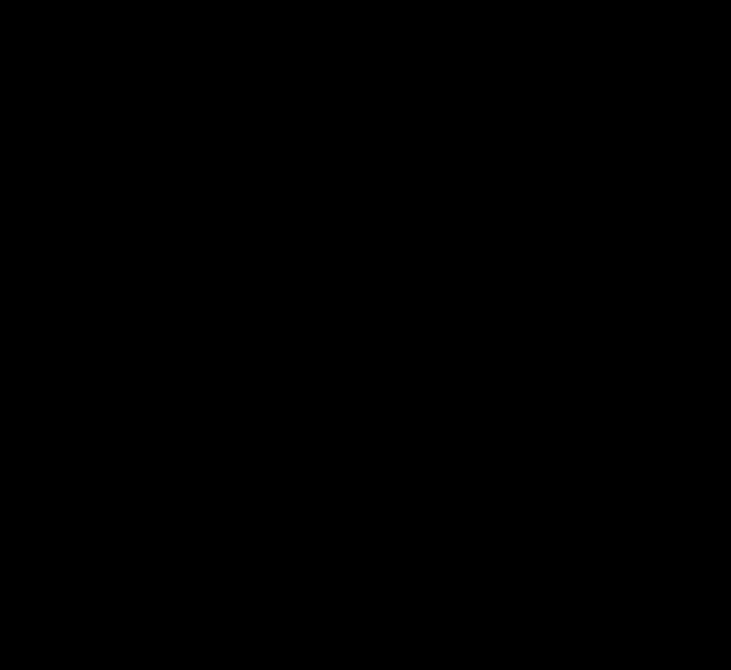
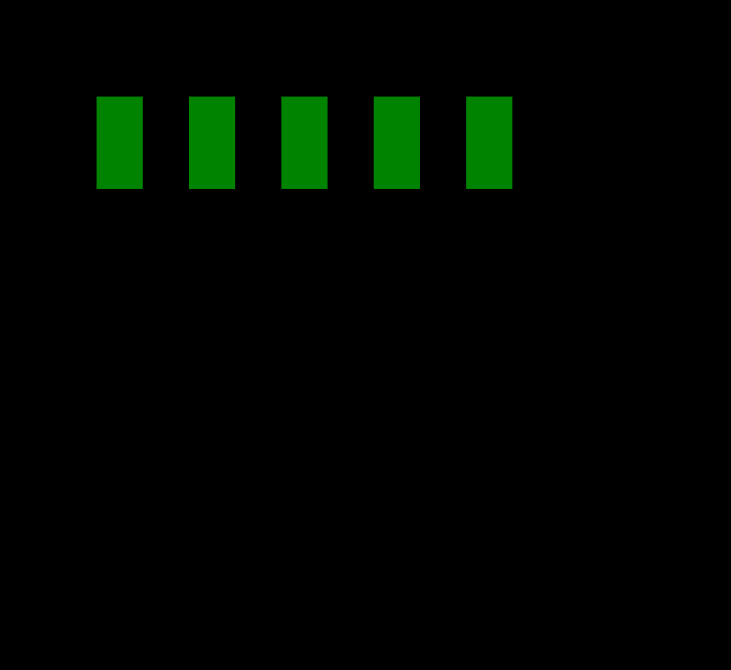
part: none -> (304, 142)

